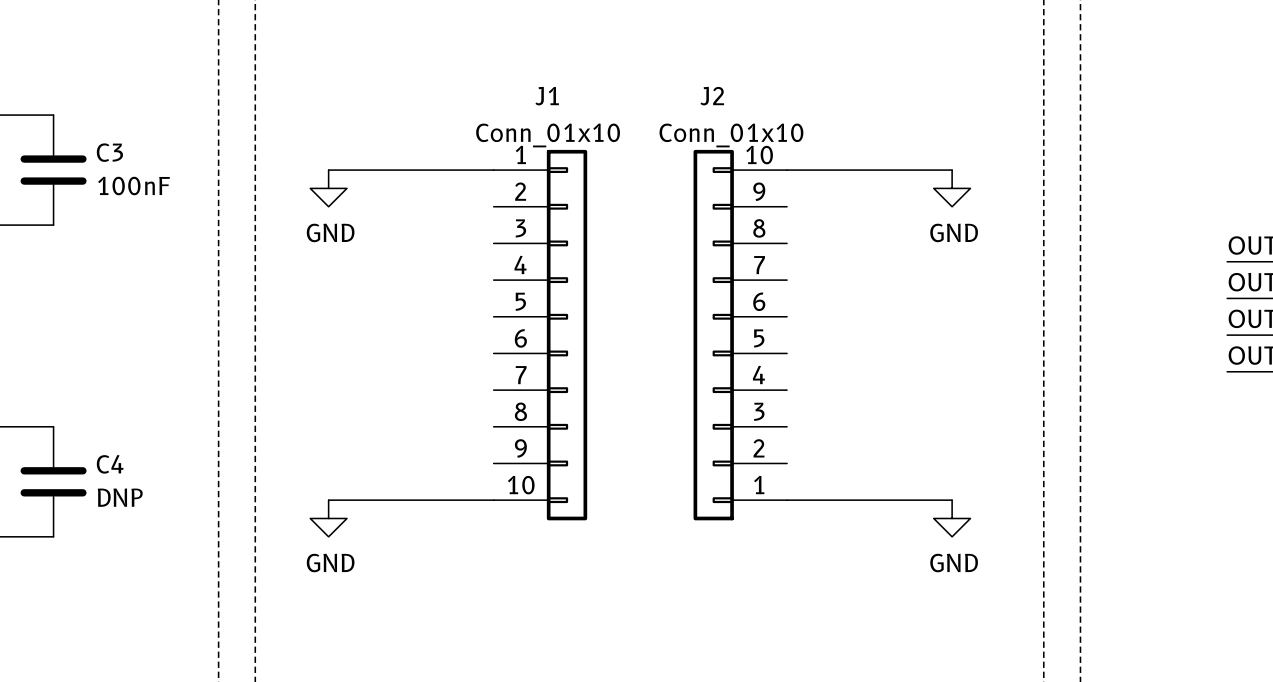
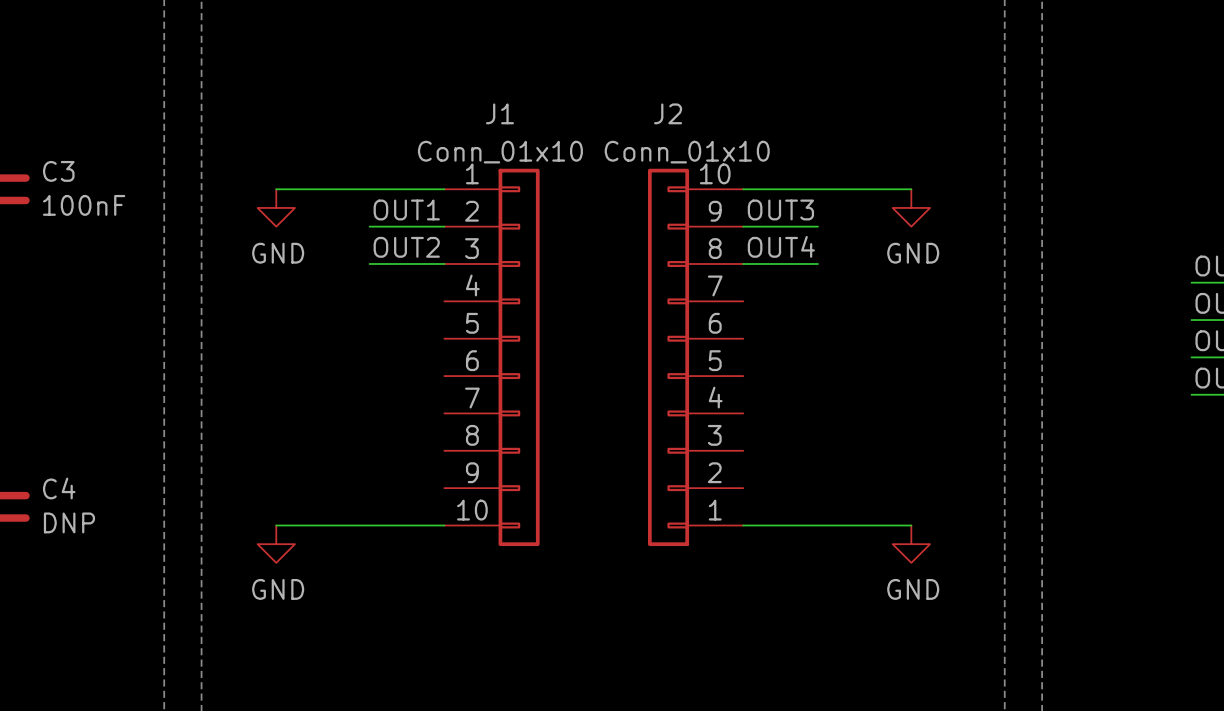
label: none -> OUT1 (406, 209)
label: none -> OUT3 (780, 209)
wire: none -> (369, 226) (444, 226)
wire: none -> (743, 226) (817, 226)
label: none -> OUT2 (406, 247)
label: none -> OUT4 (781, 246)
wire: none -> (369, 264) (444, 264)
wire: none -> (743, 264) (817, 264)

